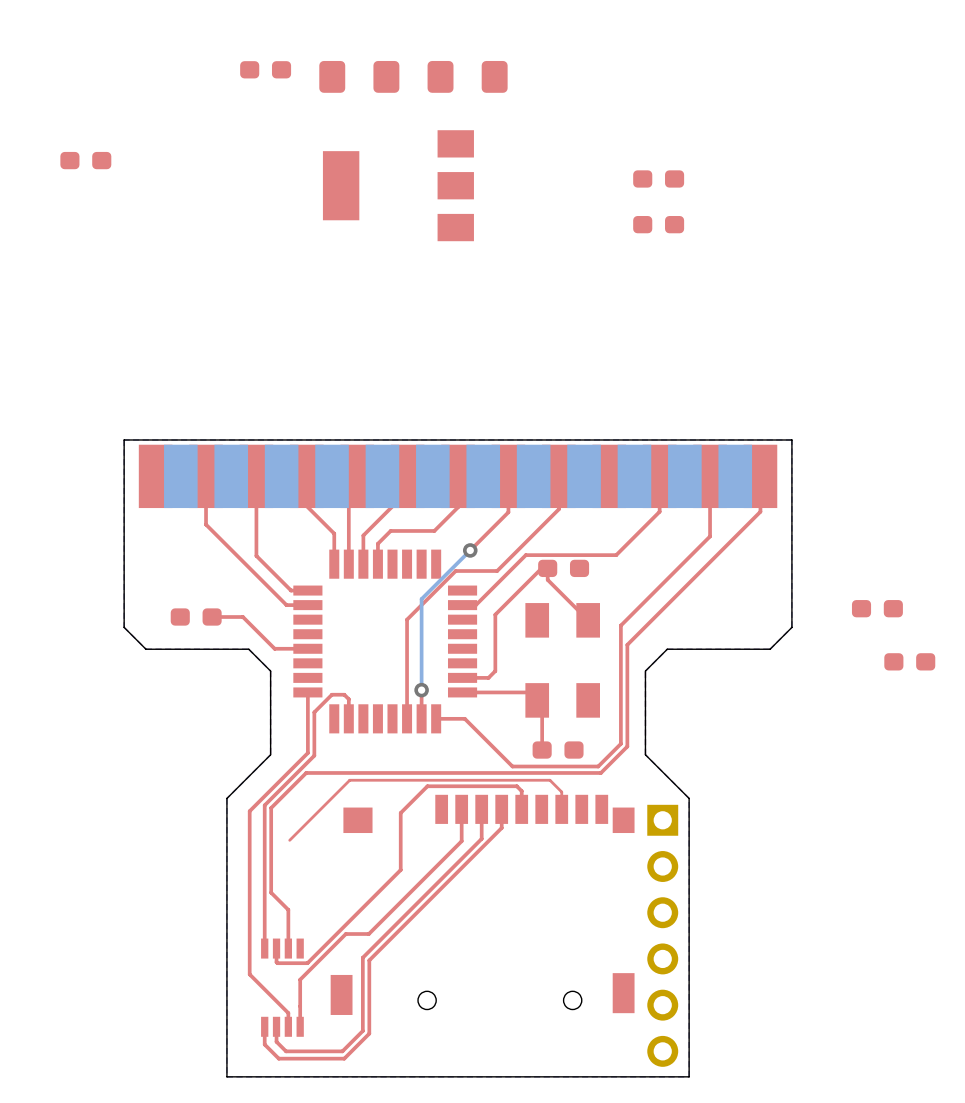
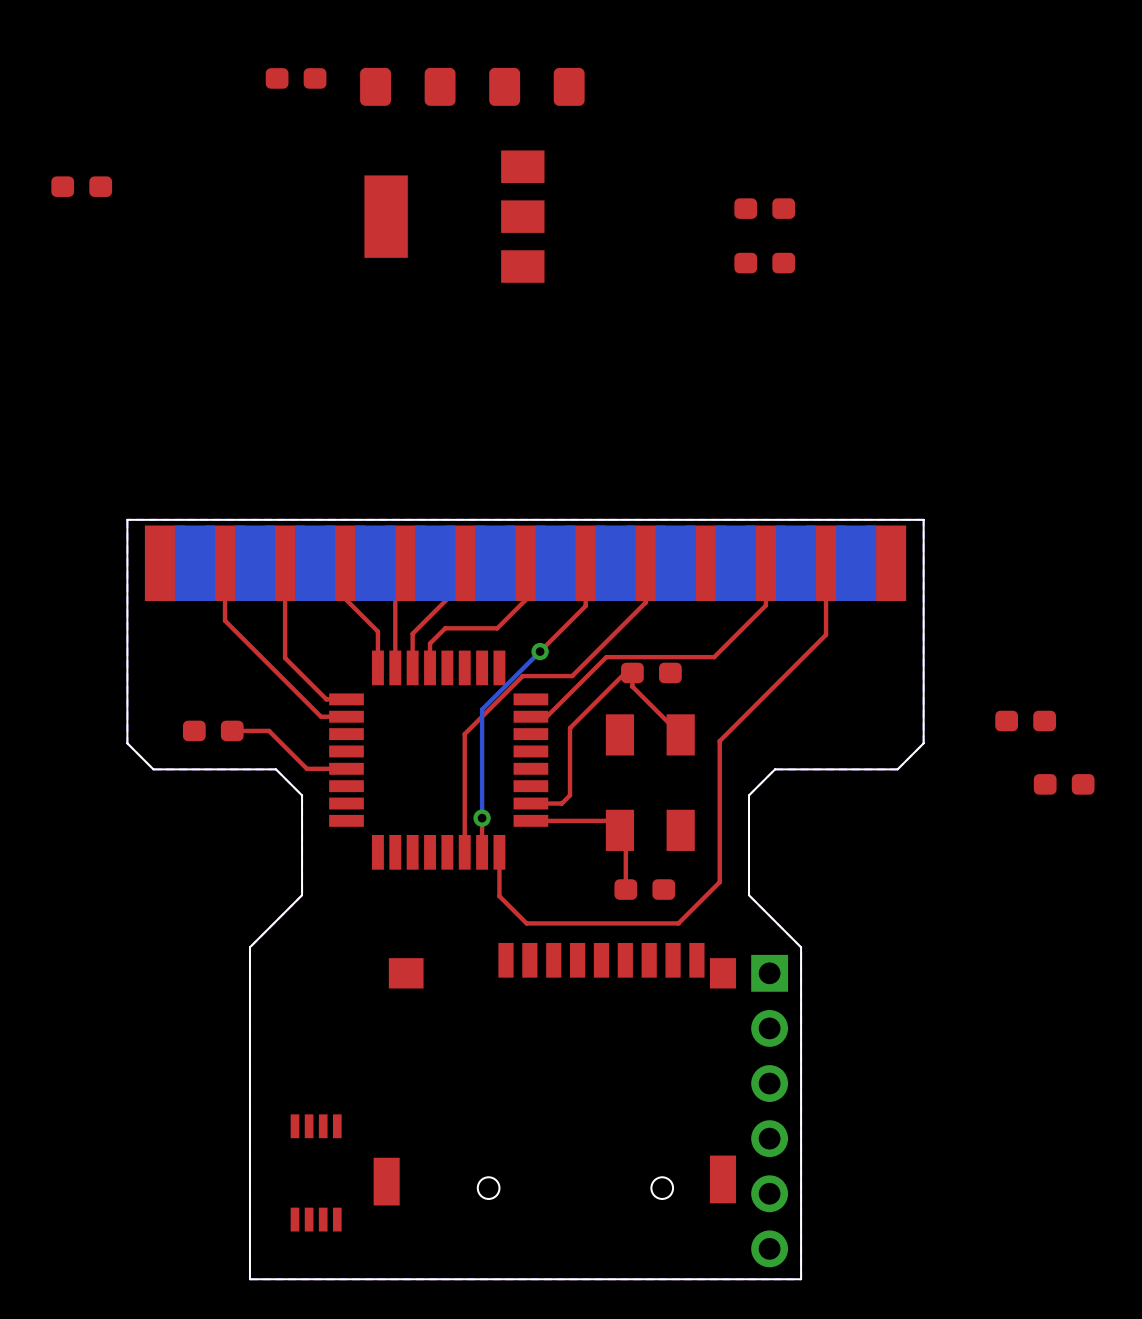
top track: (760, 476) (760, 511) (627, 644) (627, 746) (600, 772) (306, 772) (271, 808) (271, 892) (288, 909) (288, 948) -> none
top track: (307, 692) (307, 752) (249, 811) (249, 974) (288, 1013) (288, 1026) -> none
top track: (348, 718) (348, 699) (344, 694) (331, 694) (314, 712) (314, 755) (264, 805) (264, 948) -> none
top track: (436, 718) (464, 718) (512, 766) (598, 766) -> (499, 852) (499, 896) (526, 923) (678, 923) (692, 909)
top track: (461, 809) (461, 841) (368, 934) (345, 934) (300, 979) (300, 1026) -> none
top track: (481, 809) (481, 838) (362, 957) (362, 1030) (342, 1051) (286, 1051) (276, 1041) (276, 1026) -> none
top track: (501, 809) (501, 828) (369, 960) (369, 1033) (344, 1058) (278, 1058) (264, 1044) (264, 1026) -> none
top track: (521, 809) (521, 791) (516, 786) (427, 786) (400, 813) (400, 870) (307, 963) (277, 963) (276, 948) -> none
top track: (561, 821) (561, 792) (549, 780) (349, 780) (289, 840) -> none

